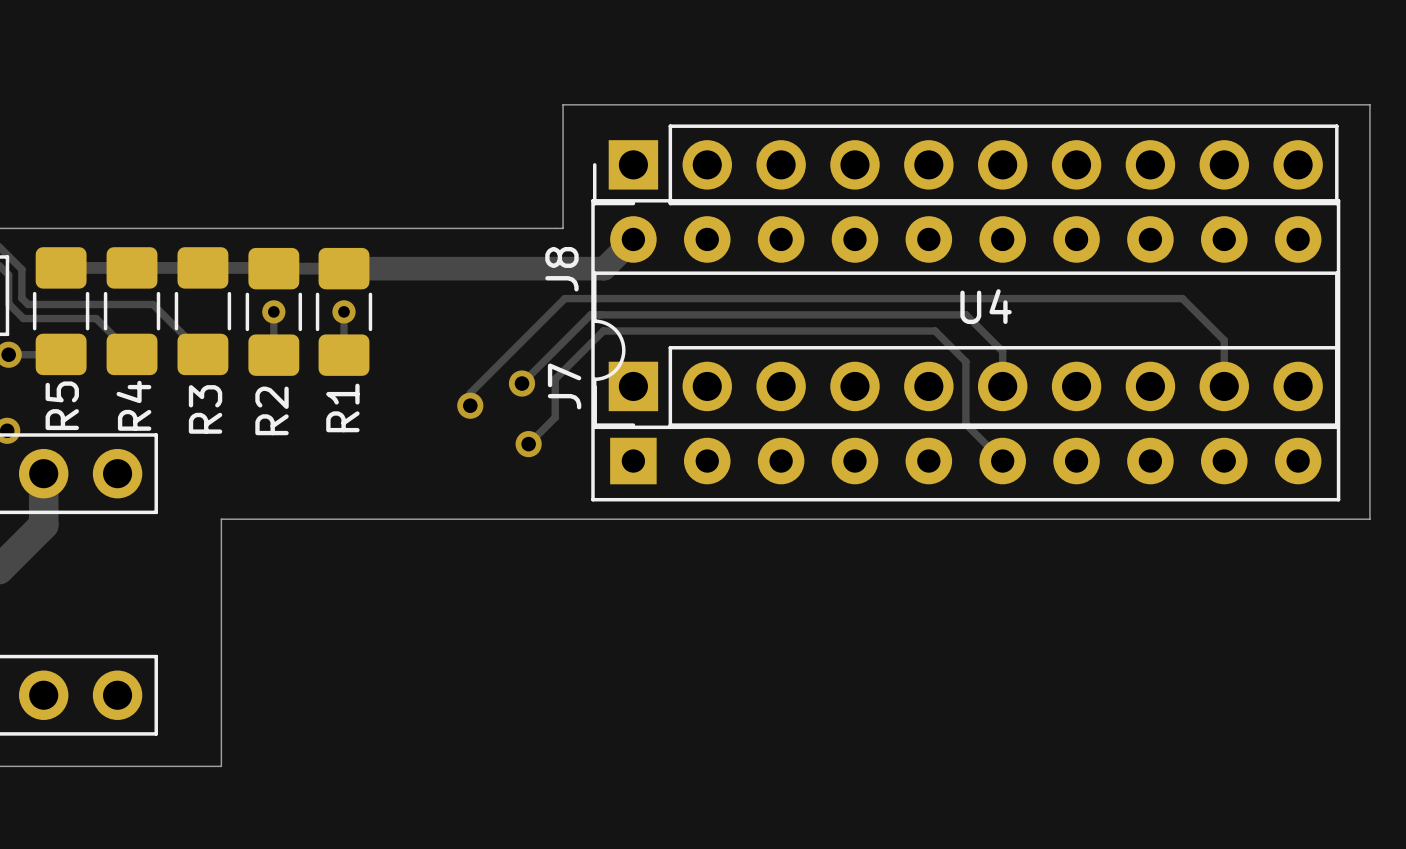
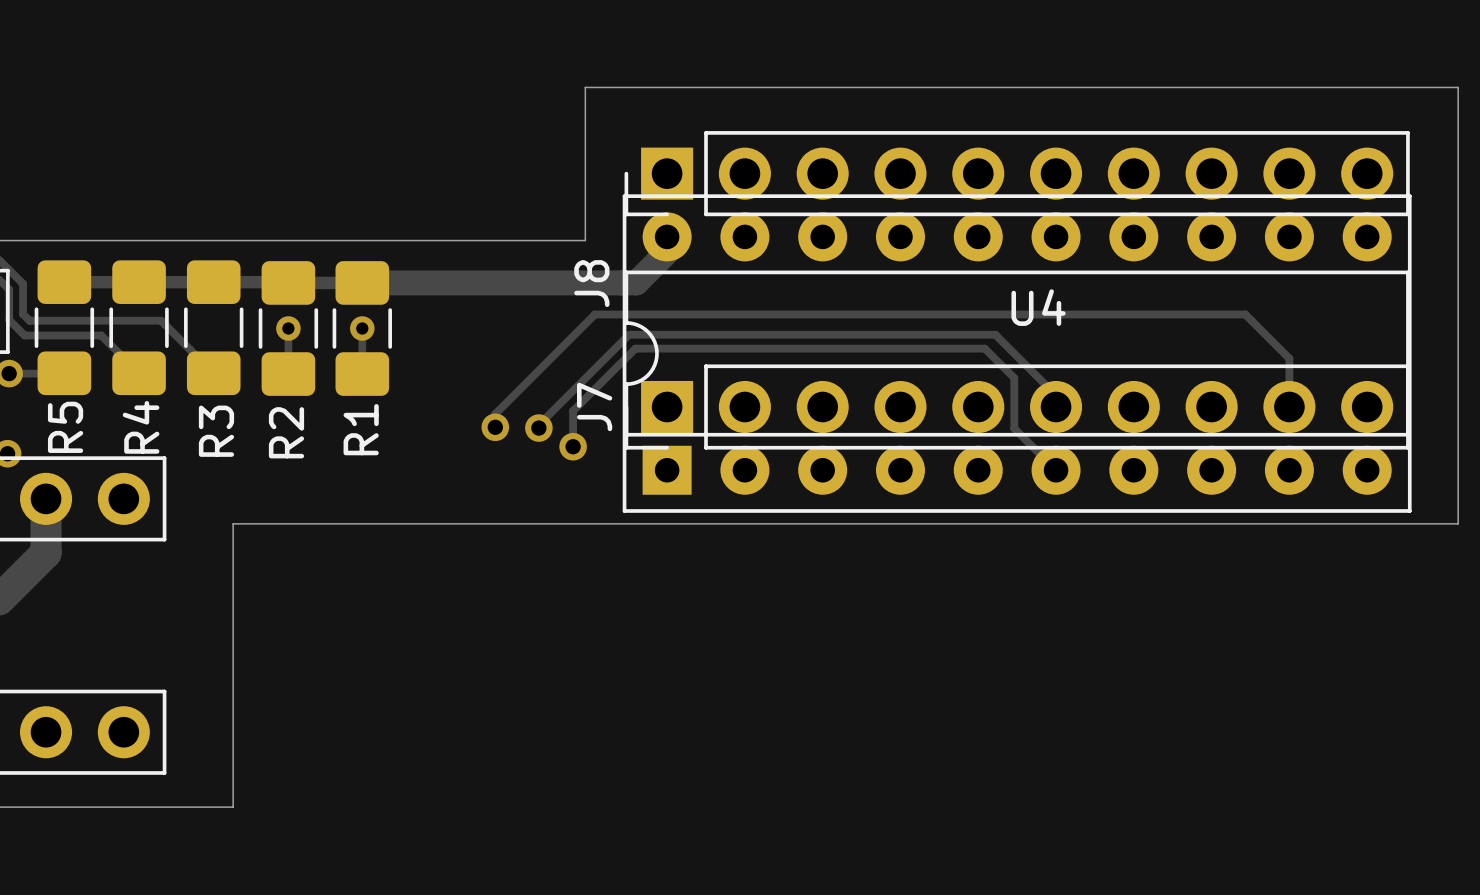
board edge: (555, 228) (563, 228) (563, 104) (1369, 104) (1369, 519) (221, 519) -> (585, 240) (585, 87) (1458, 87) (1458, 523) (233, 523) (233, 546)
U4 position: (965, 350) -> (1017, 353)
track: (963, 358) (965, 361) (965, 424) (1002, 461) -> (1014, 378) (1014, 428) (1056, 470)
track: none -> (1056, 395) (995, 334) (629, 334) (538, 424) (538, 428)
track: (555, 379) (555, 417) (528, 444) -> (584, 399) (573, 410) (573, 446)
track: (521, 383) (590, 314) (966, 314) (1002, 351) (1002, 386) -> none
via position: (521, 383) -> (538, 428)
via position: (528, 444) -> (573, 446)

